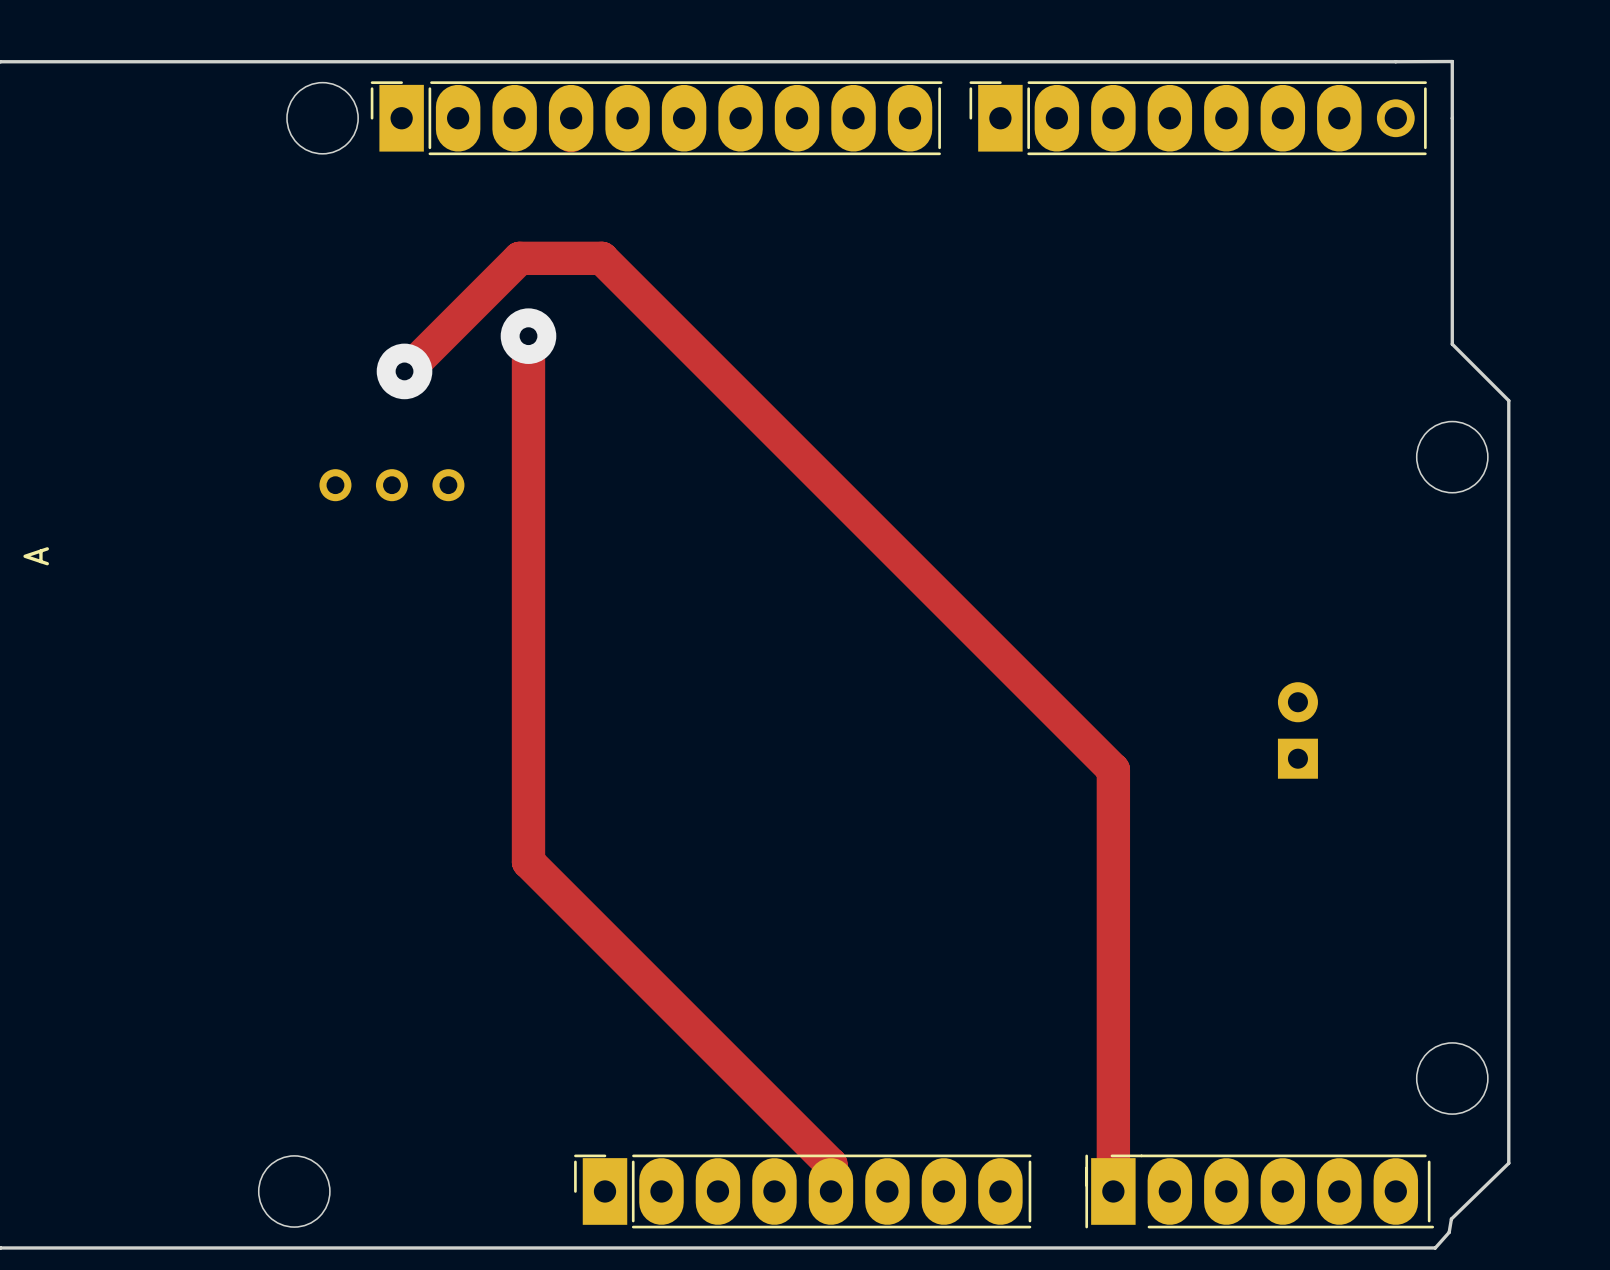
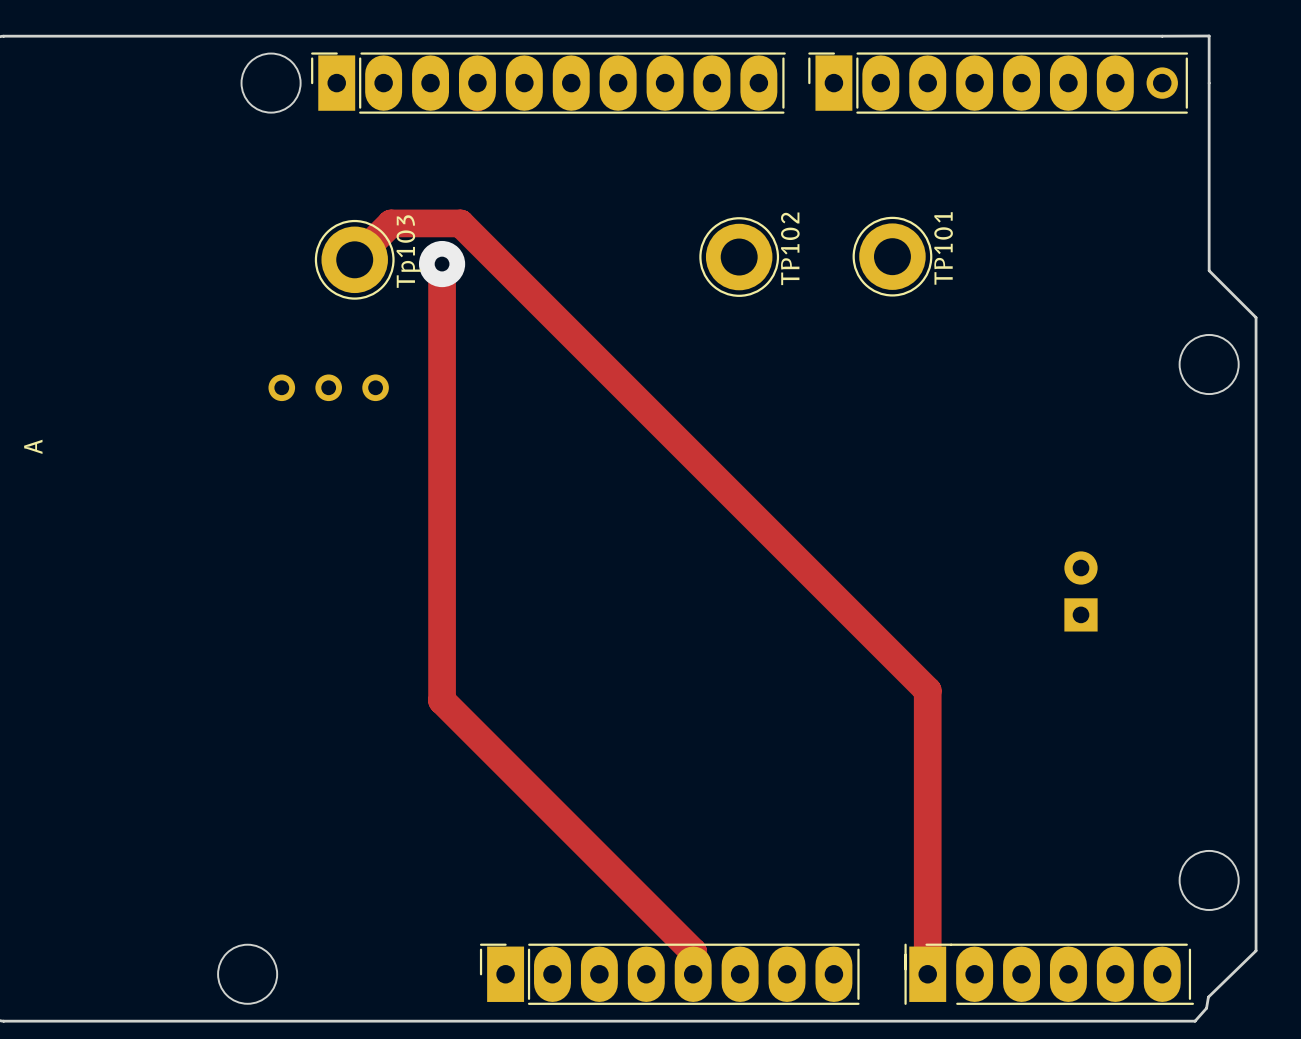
TP102: none -> (739, 257)
TP101: none -> (892, 256)
Tp103: none -> (354, 259)
via: (404, 371) -> none
track: (406, 371) (519, 258) (601, 258) (1113, 769) (1113, 849) -> (354, 259) (391, 223) (460, 223) (927, 690)

